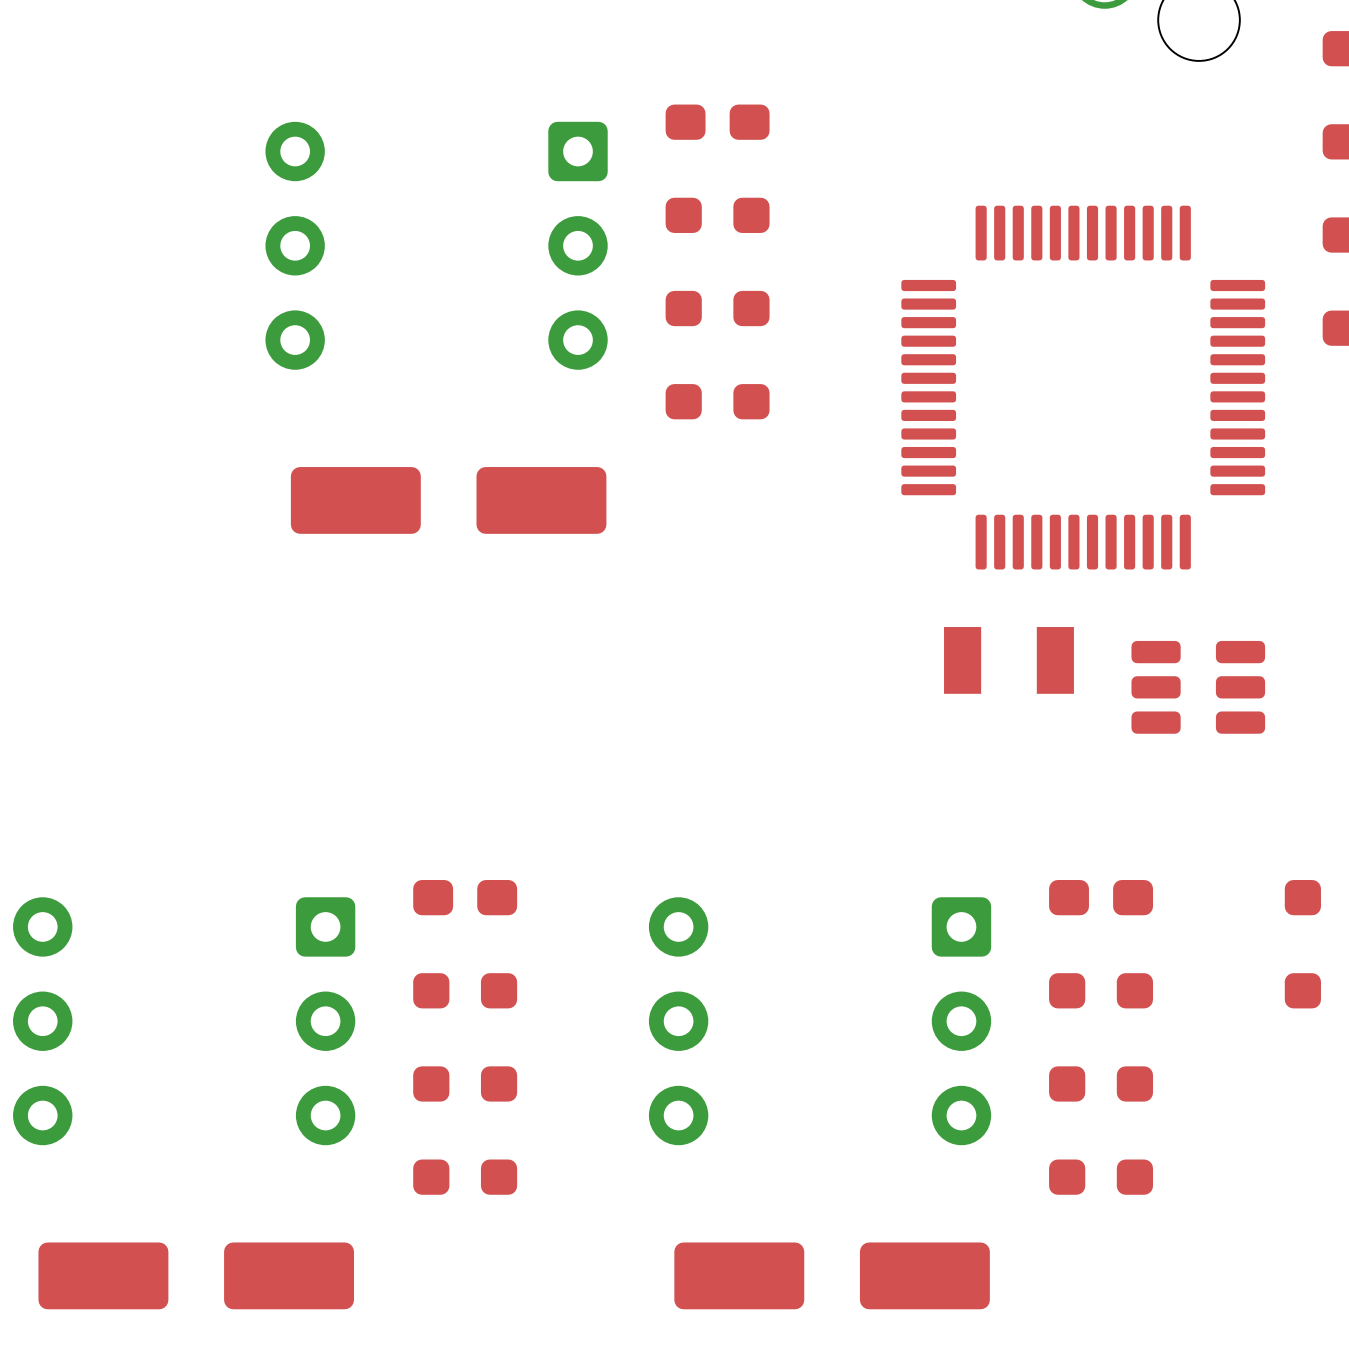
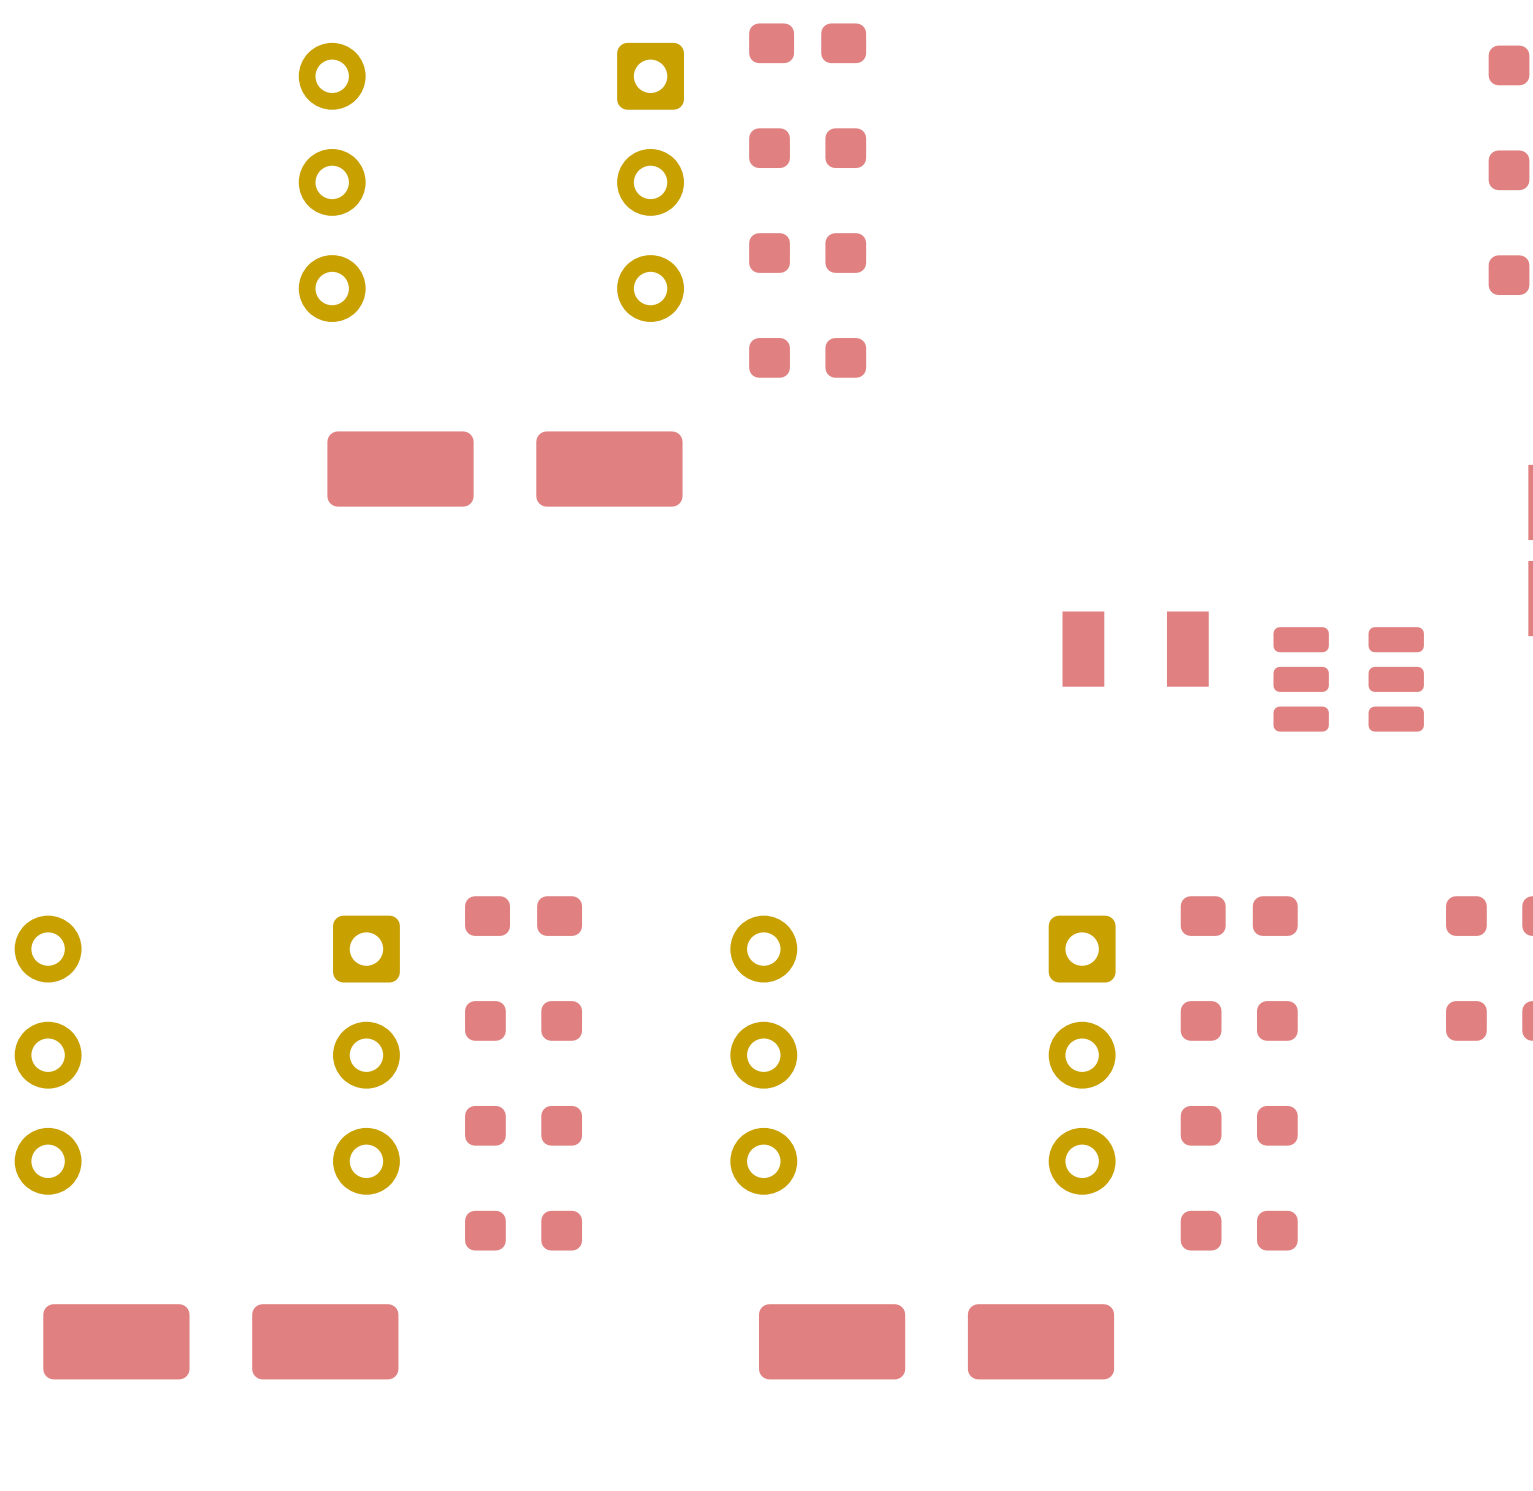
part: (1083, 387) -> none

